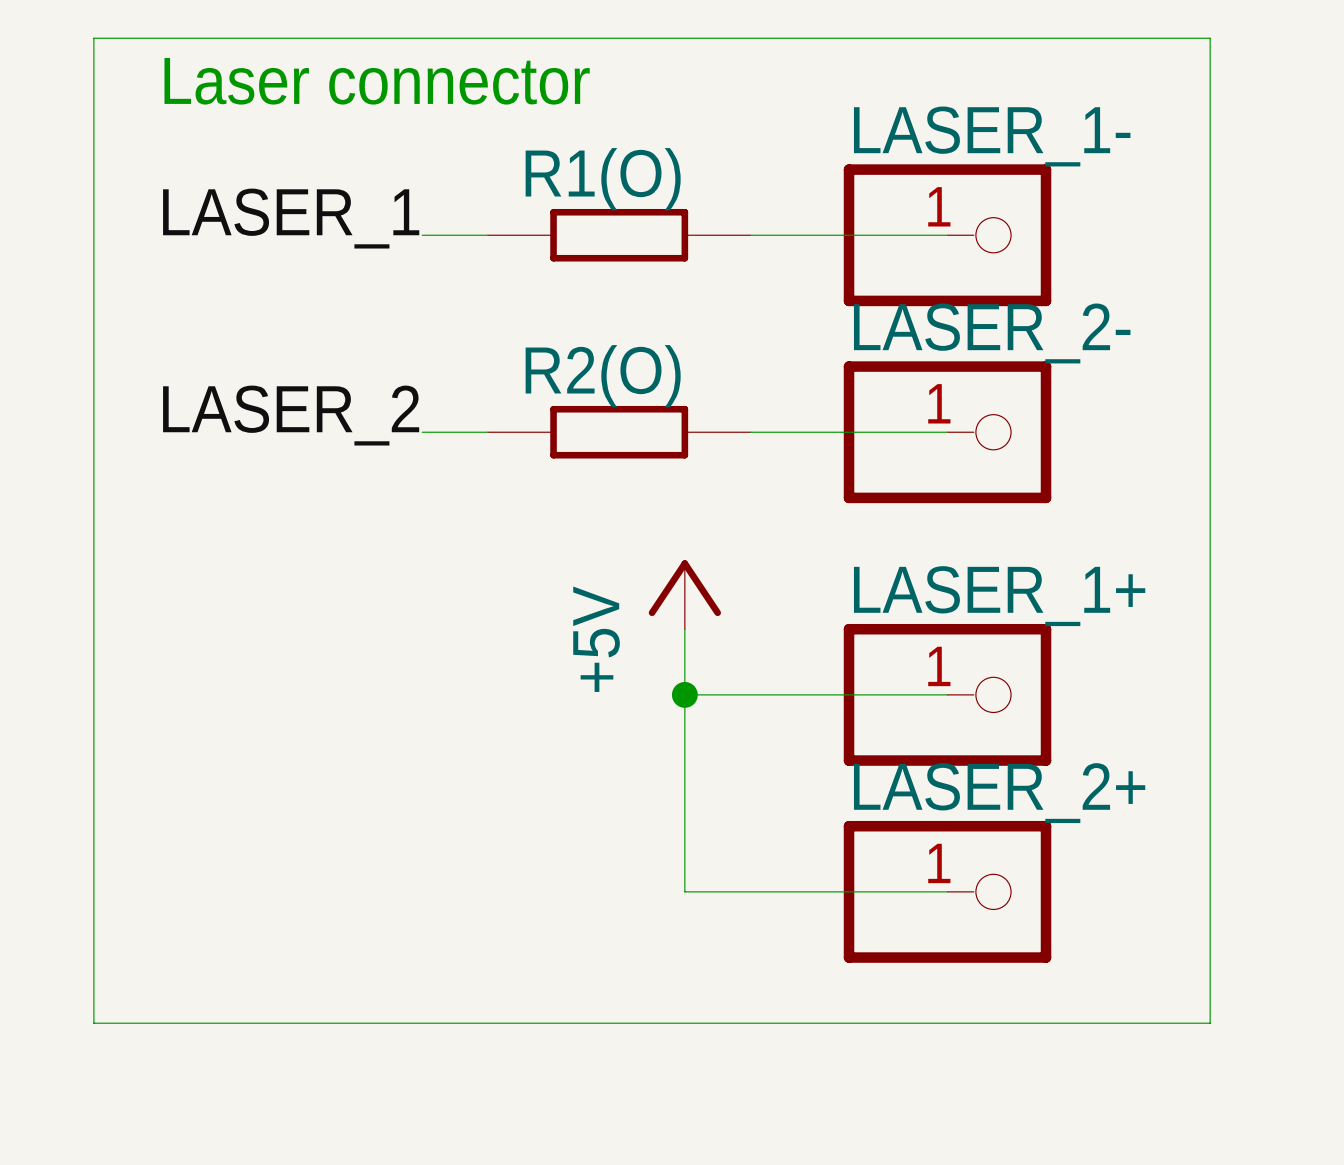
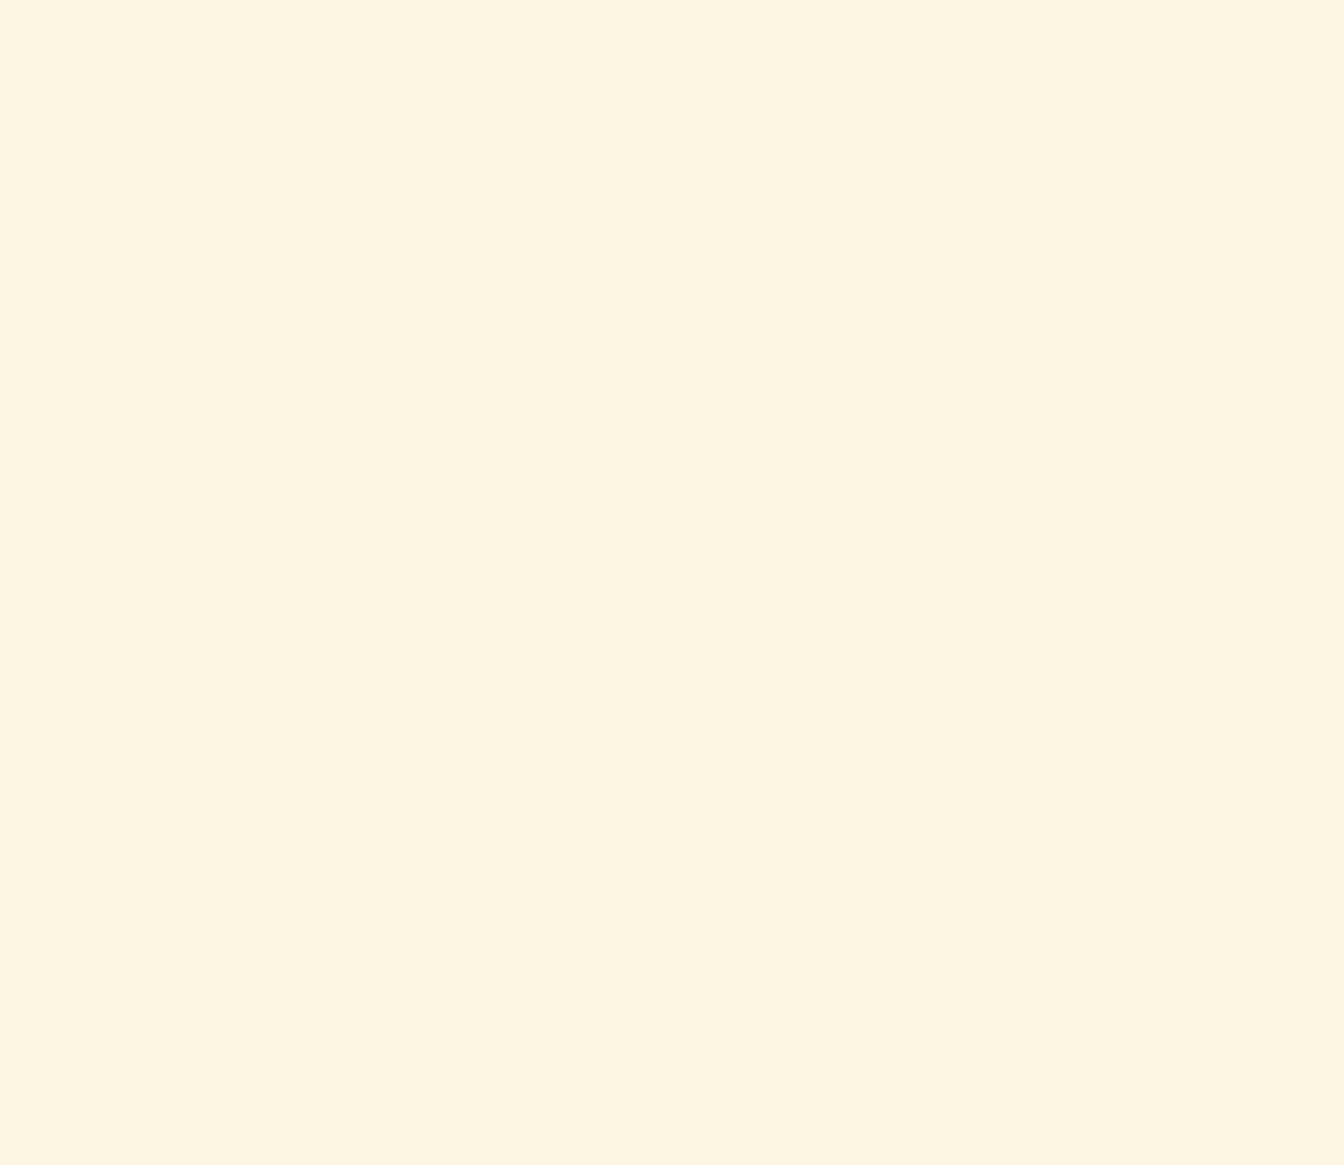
wire: (93, 38) (93, 1023) (1210, 1023) (1210, 38) (93, 38) -> none
text: Laser connector (377, 81) -> none
label: LASER_1 (291, 218) -> none
wire: (422, 235) (487, 235) -> none
R1(O): (619, 235) -> none
wire: (750, 235) (947, 235) -> none
LASER_1-: (947, 235) -> none
label: LASER_2 (291, 415) -> none
wire: (422, 432) (487, 432) -> none
R2(O): (619, 432) -> none
wire: (750, 432) (947, 432) -> none
LASER_2-: (947, 432) -> none
power symbol: +5V (684, 594) -> none
wire: (684, 629) (684, 891) (947, 891) -> none
wire: (684, 694) (947, 694) -> none
junction: (684, 694) -> none
LASER_1+: (947, 694) -> none
LASER_2+: (947, 891) -> none

